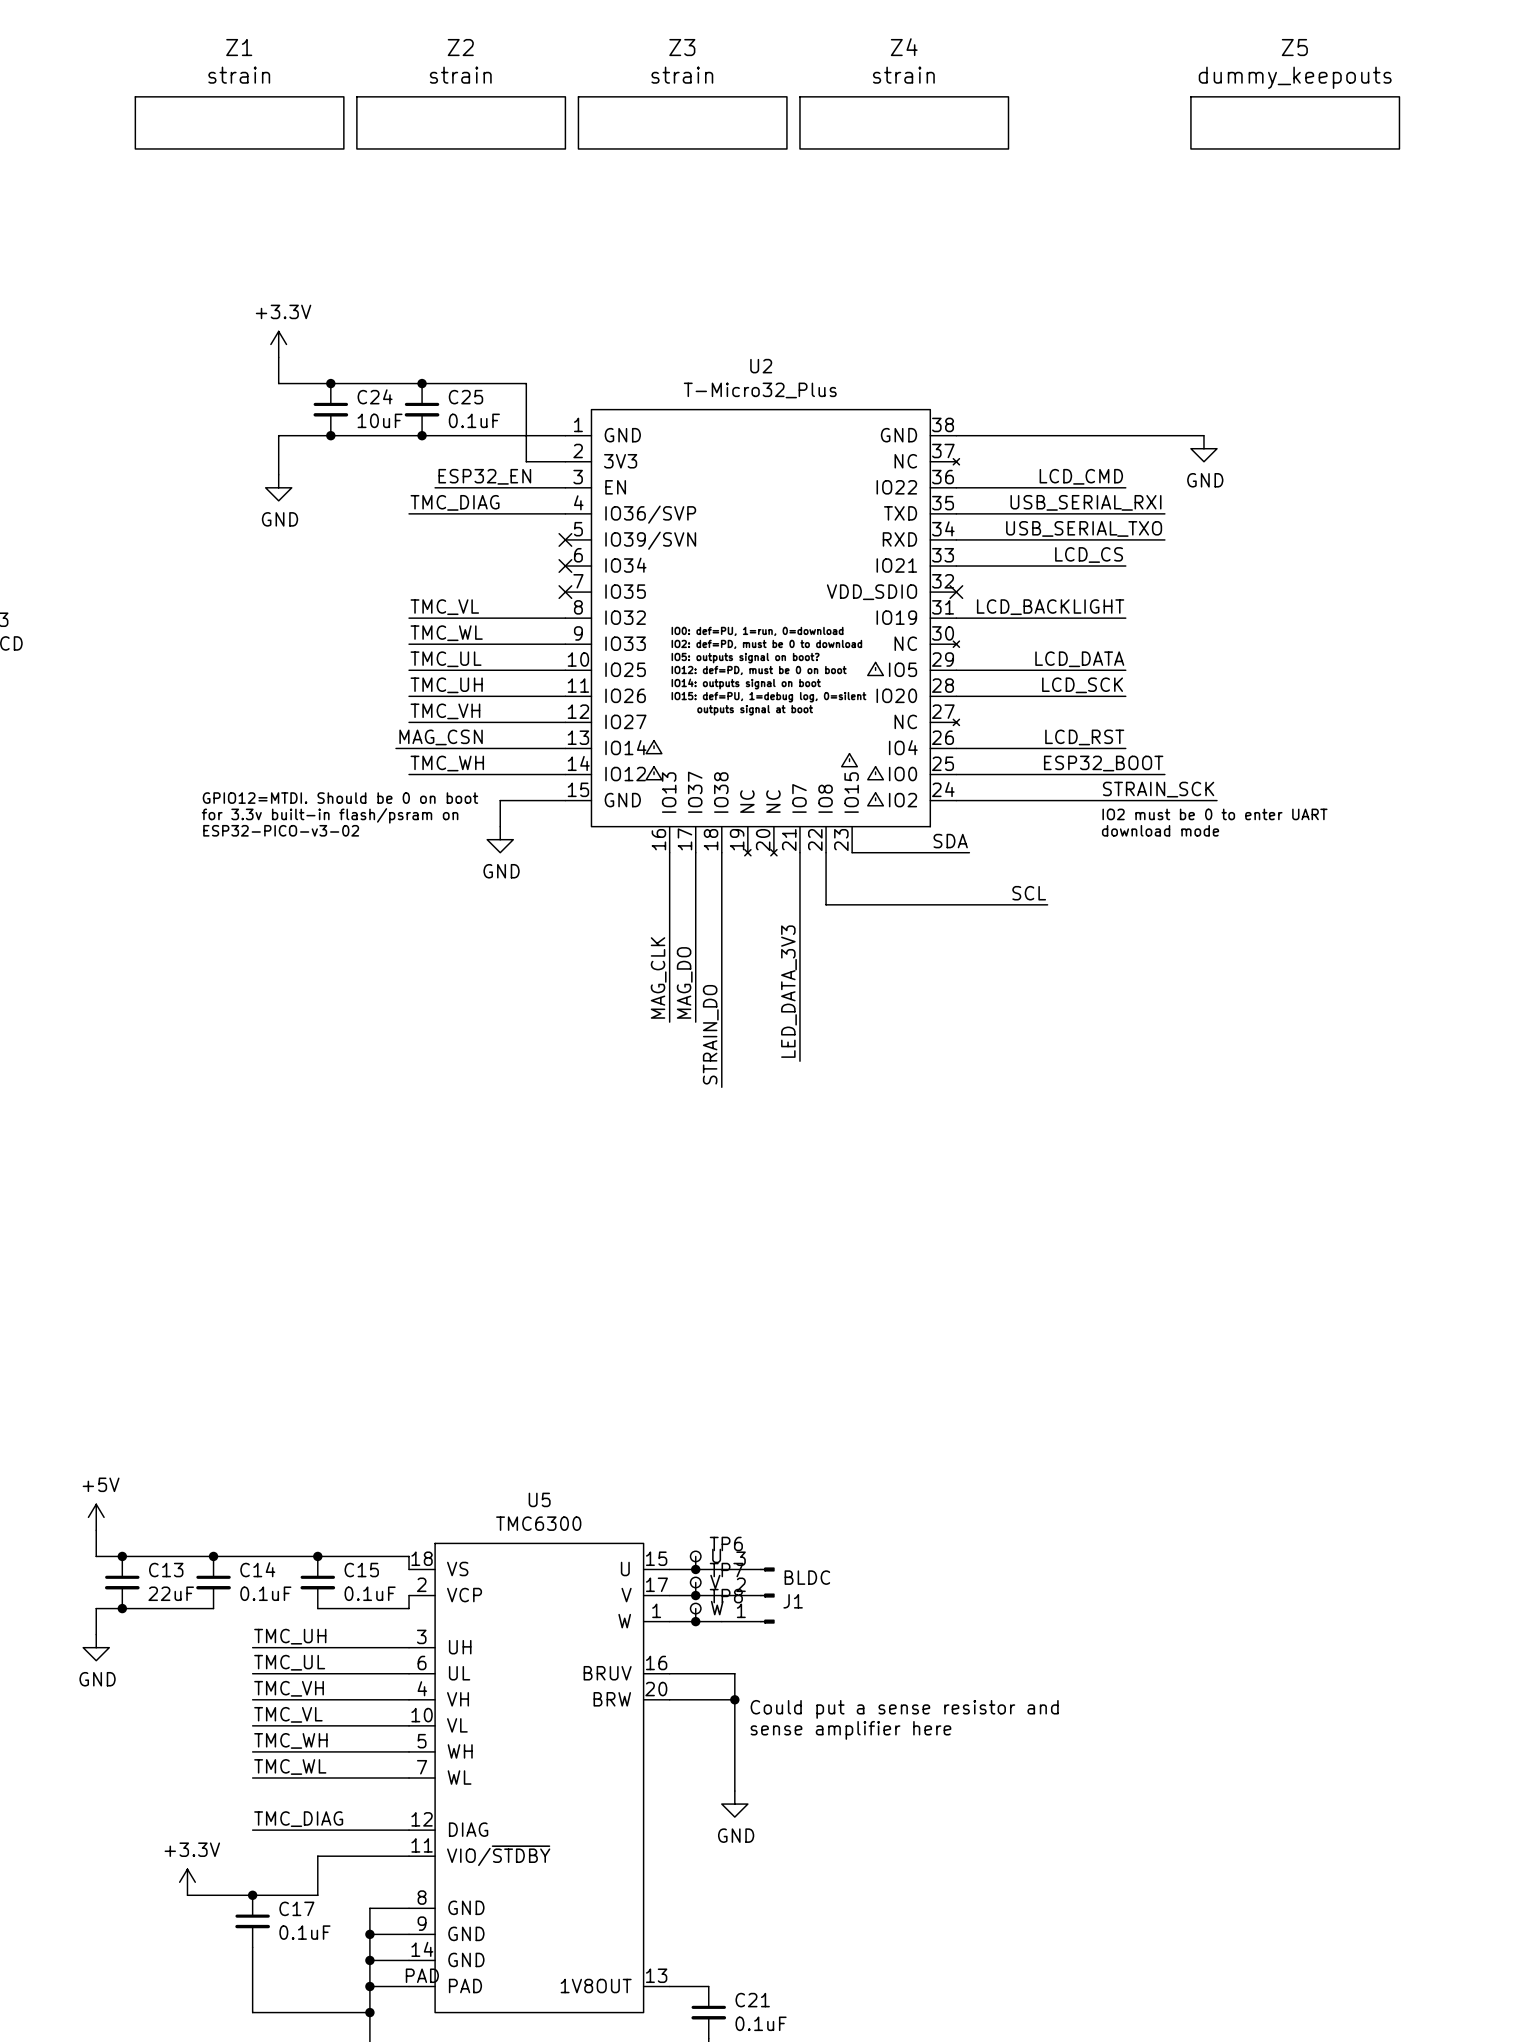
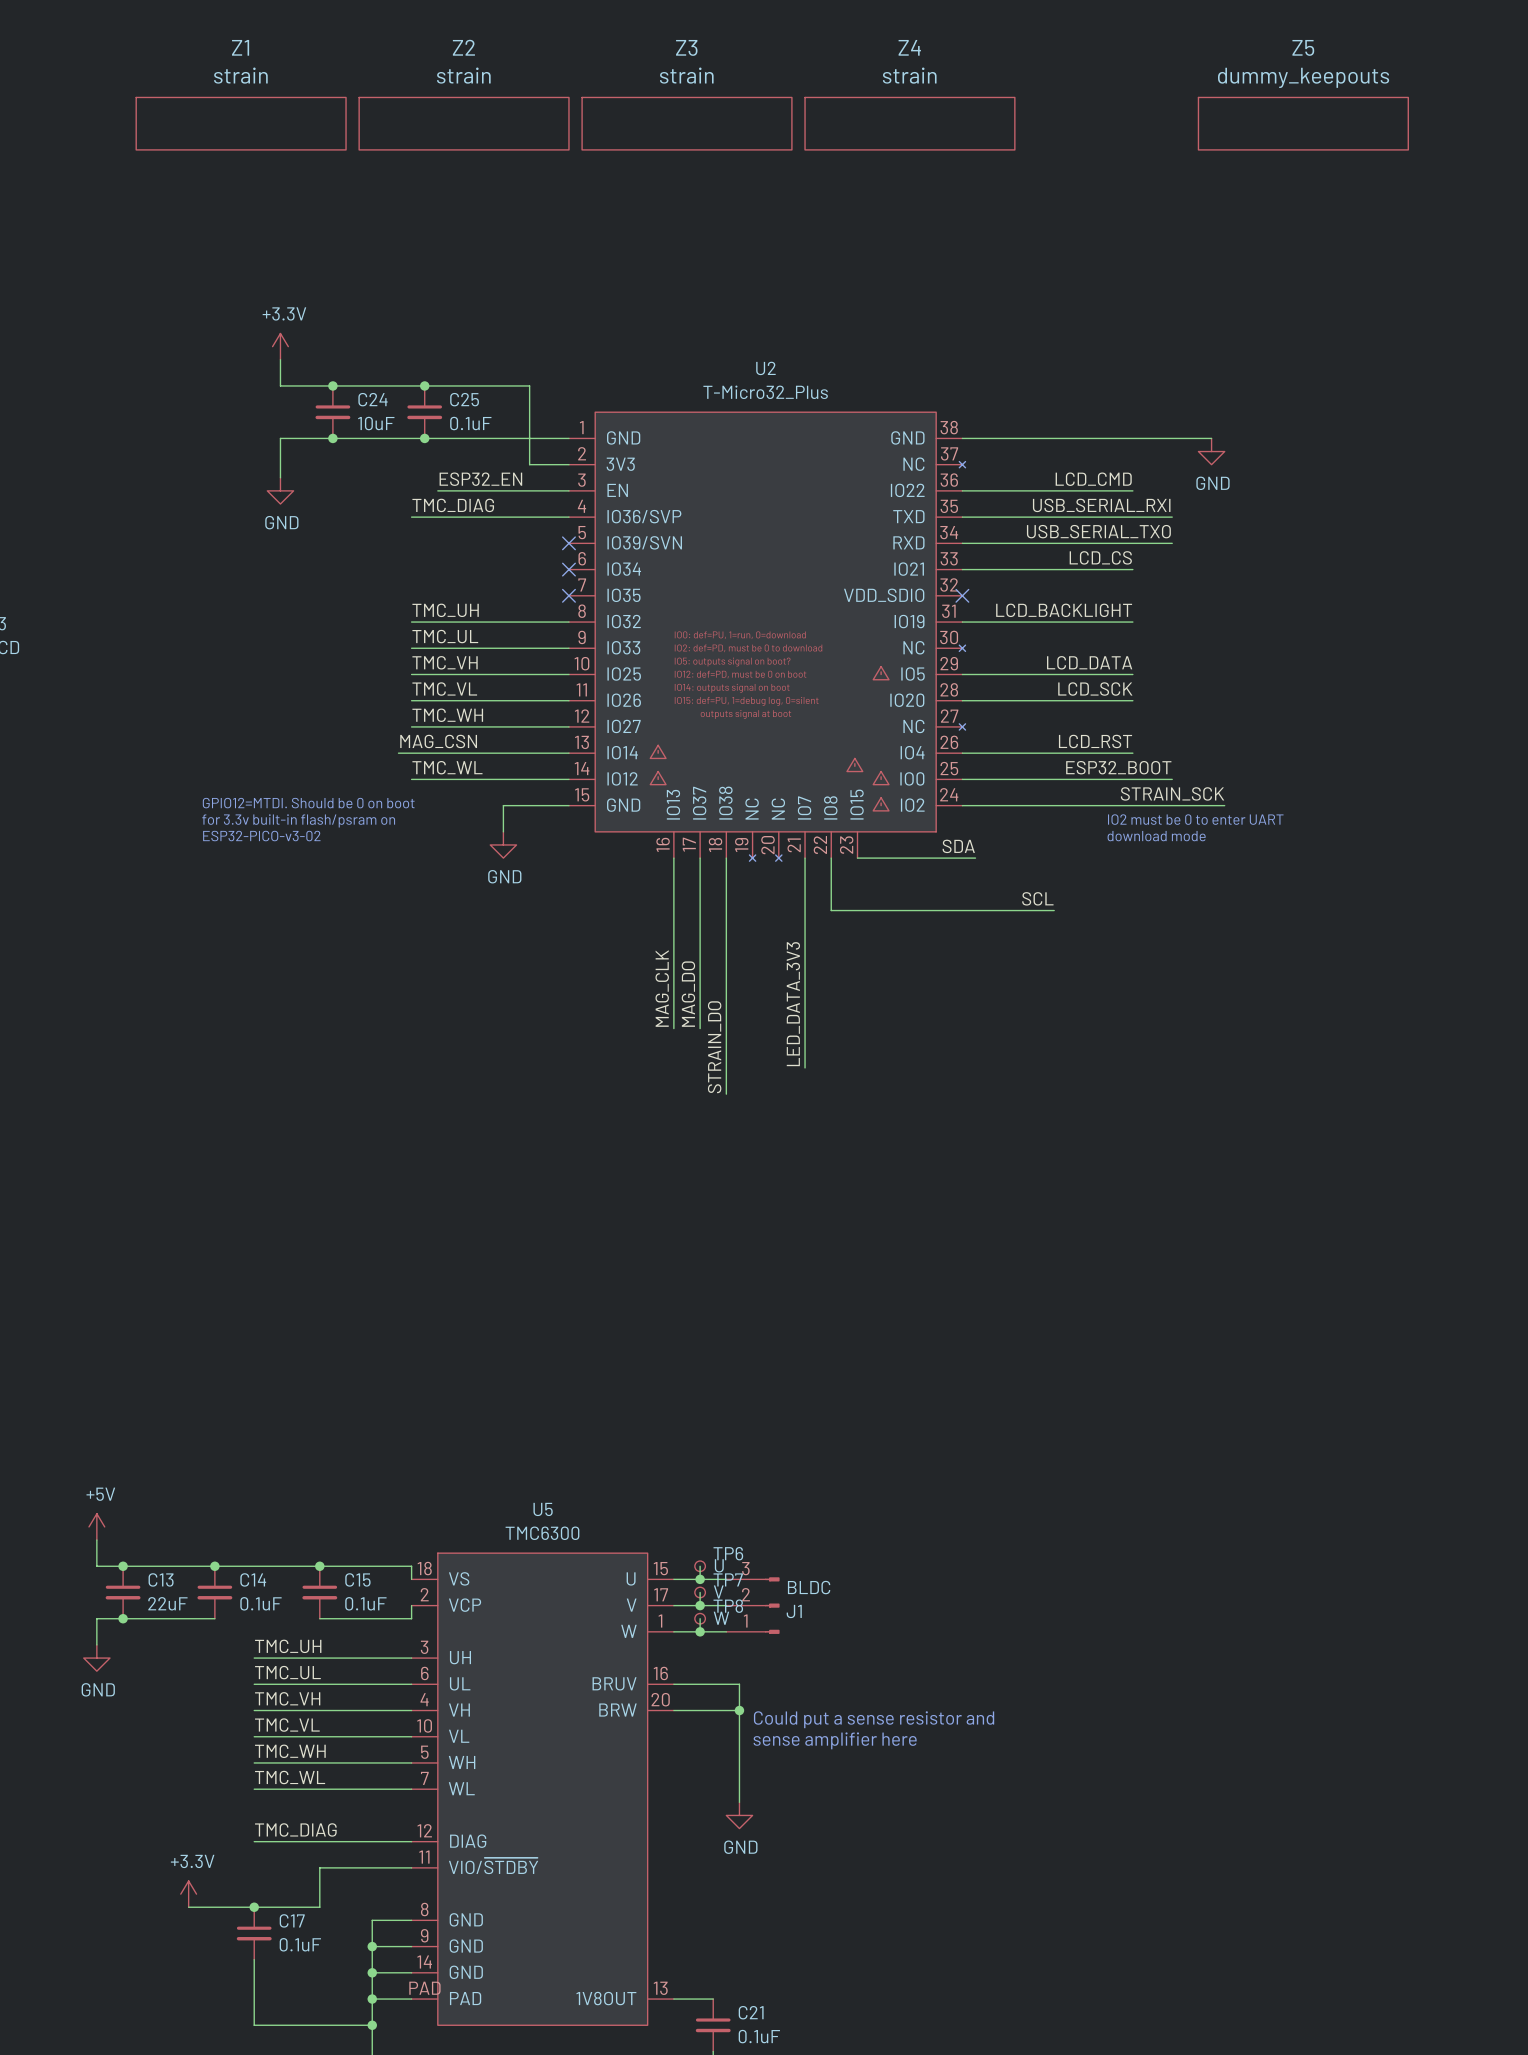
label: TMC_VL (444, 607) -> TMC_UH (445, 610)
label: TMC_WL (446, 633) -> TMC_UL (445, 636)
label: TMC_UL (446, 659) -> TMC_VH (445, 662)
label: TMC_UH (446, 685) -> TMC_VL (444, 689)
label: TMC_VH (445, 711) -> TMC_WH (447, 715)
label: TMC_WH (447, 763) -> TMC_WL (447, 767)

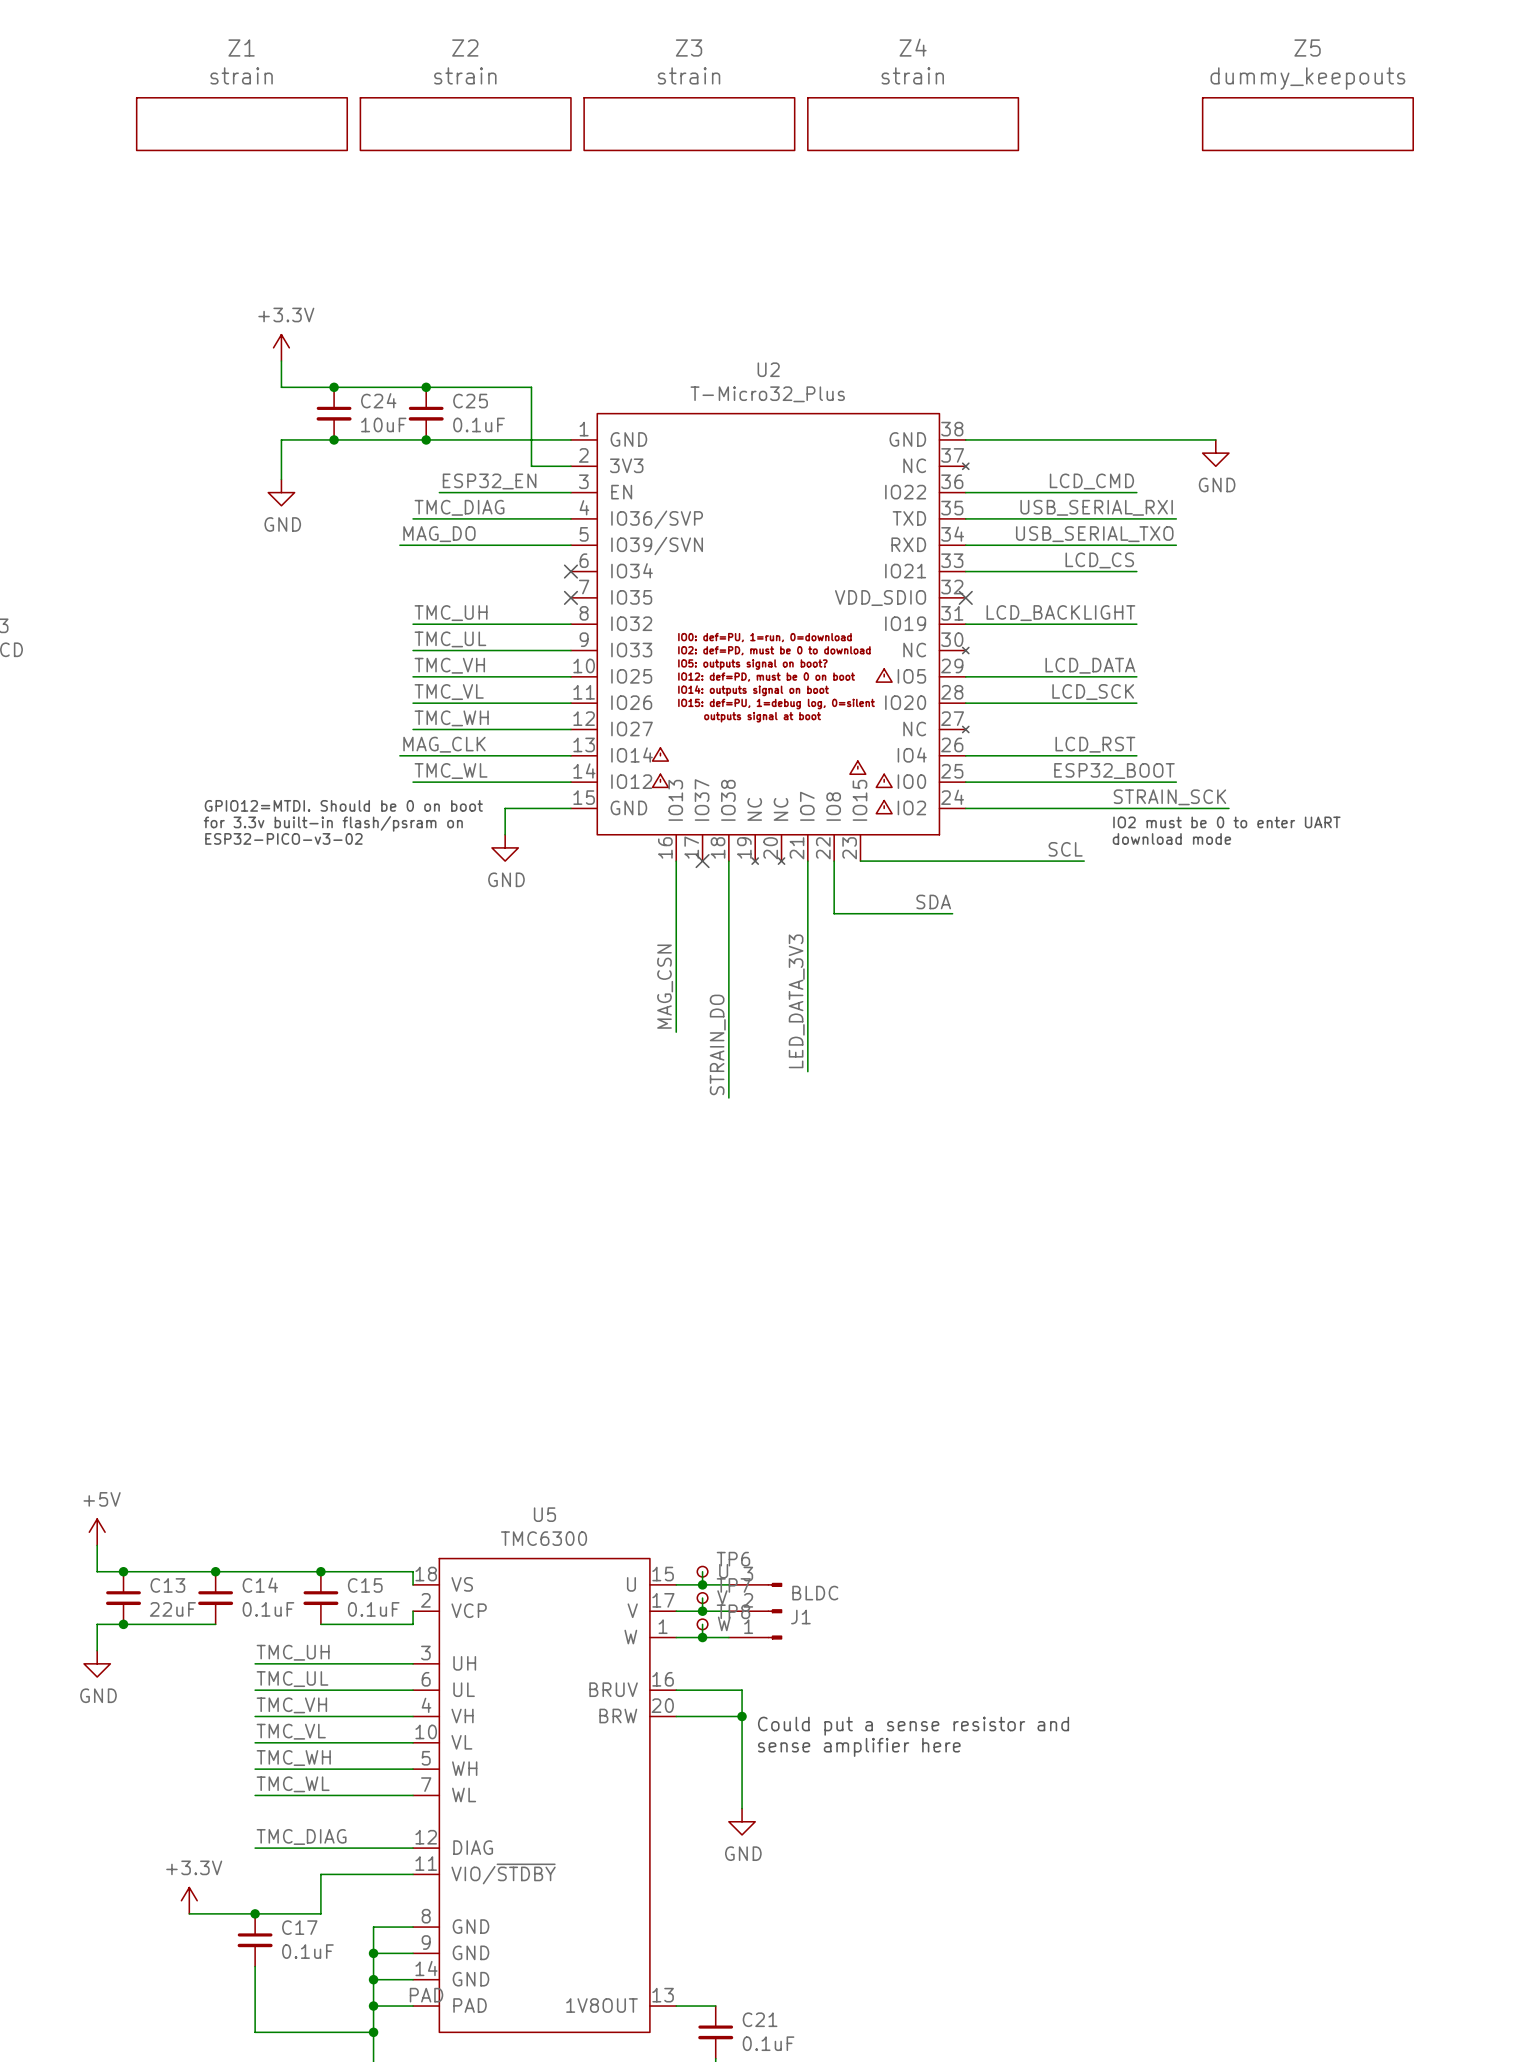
label: none -> MAG_DO (439, 534)
wire: none -> (399, 545) (570, 545)
no-connect mark: (568, 543) -> none
label: MAG_CSN (438, 741) -> MAG_CLK (444, 744)
label position: SDA (958, 846) -> SDA (933, 901)
wire: (700, 858) (700, 1028) -> none
no-connect mark: none -> (702, 861)
label position: SCL (1037, 898) -> SCL (1065, 849)
wire: (949, 910) (1054, 910) -> (978, 861) (1084, 861)
label: MAG_CLK (662, 988) -> MAG_CSN (665, 986)
label: MAG_DO (688, 994) -> none

